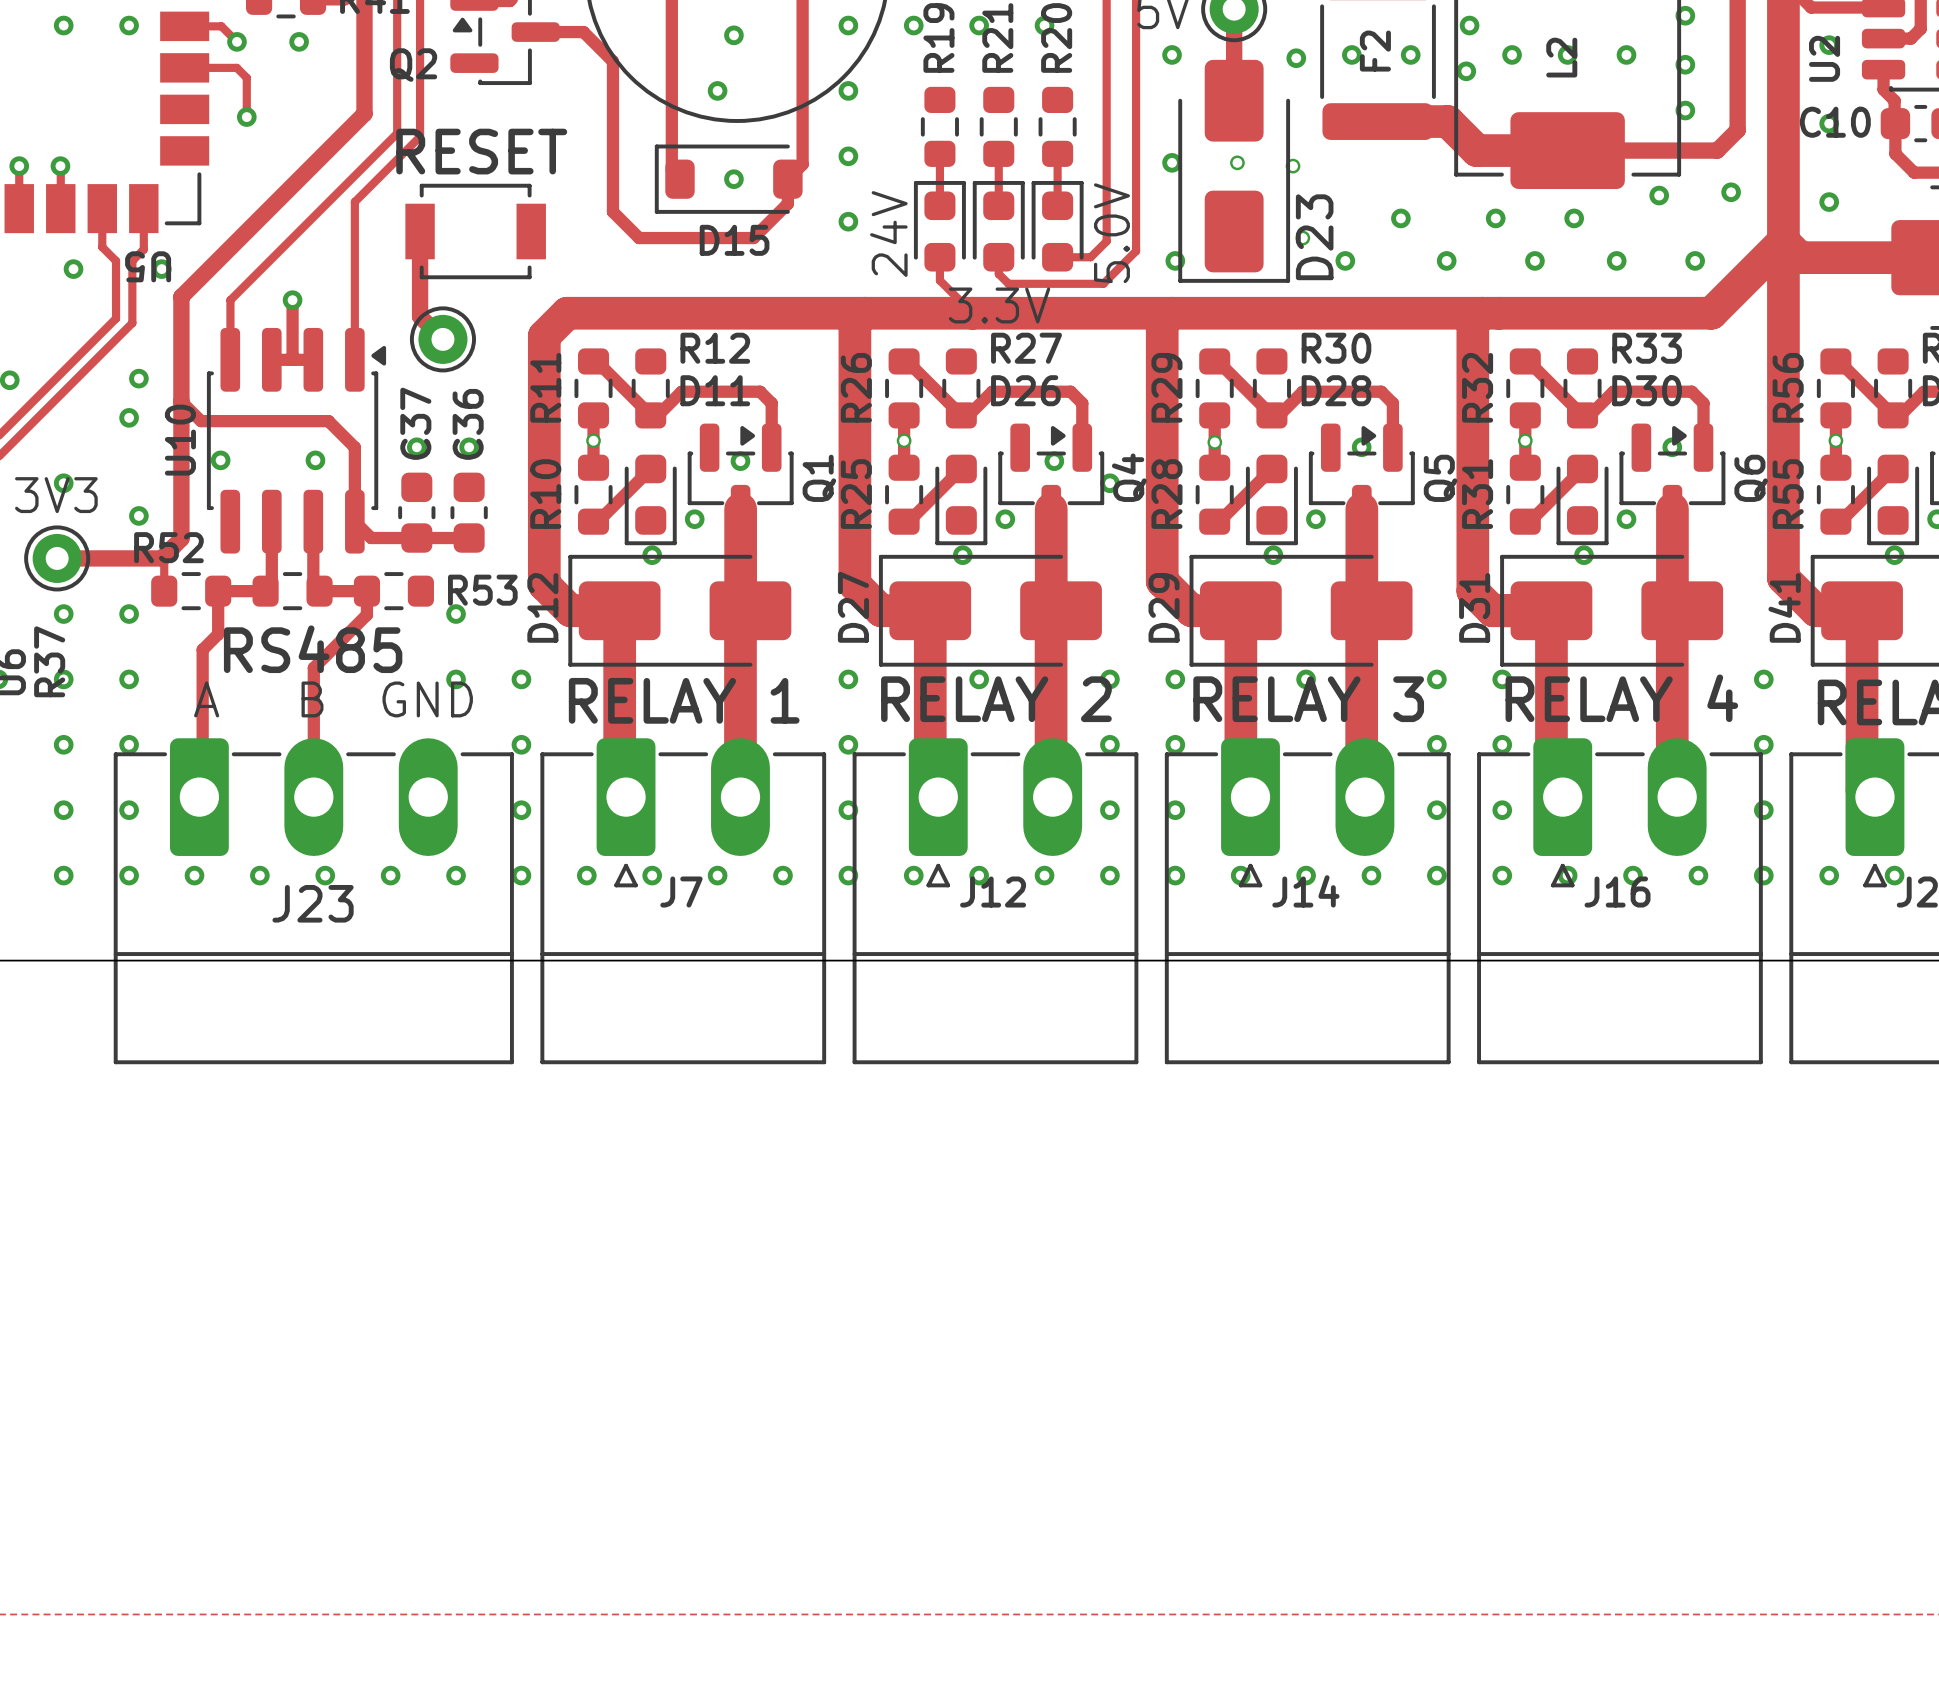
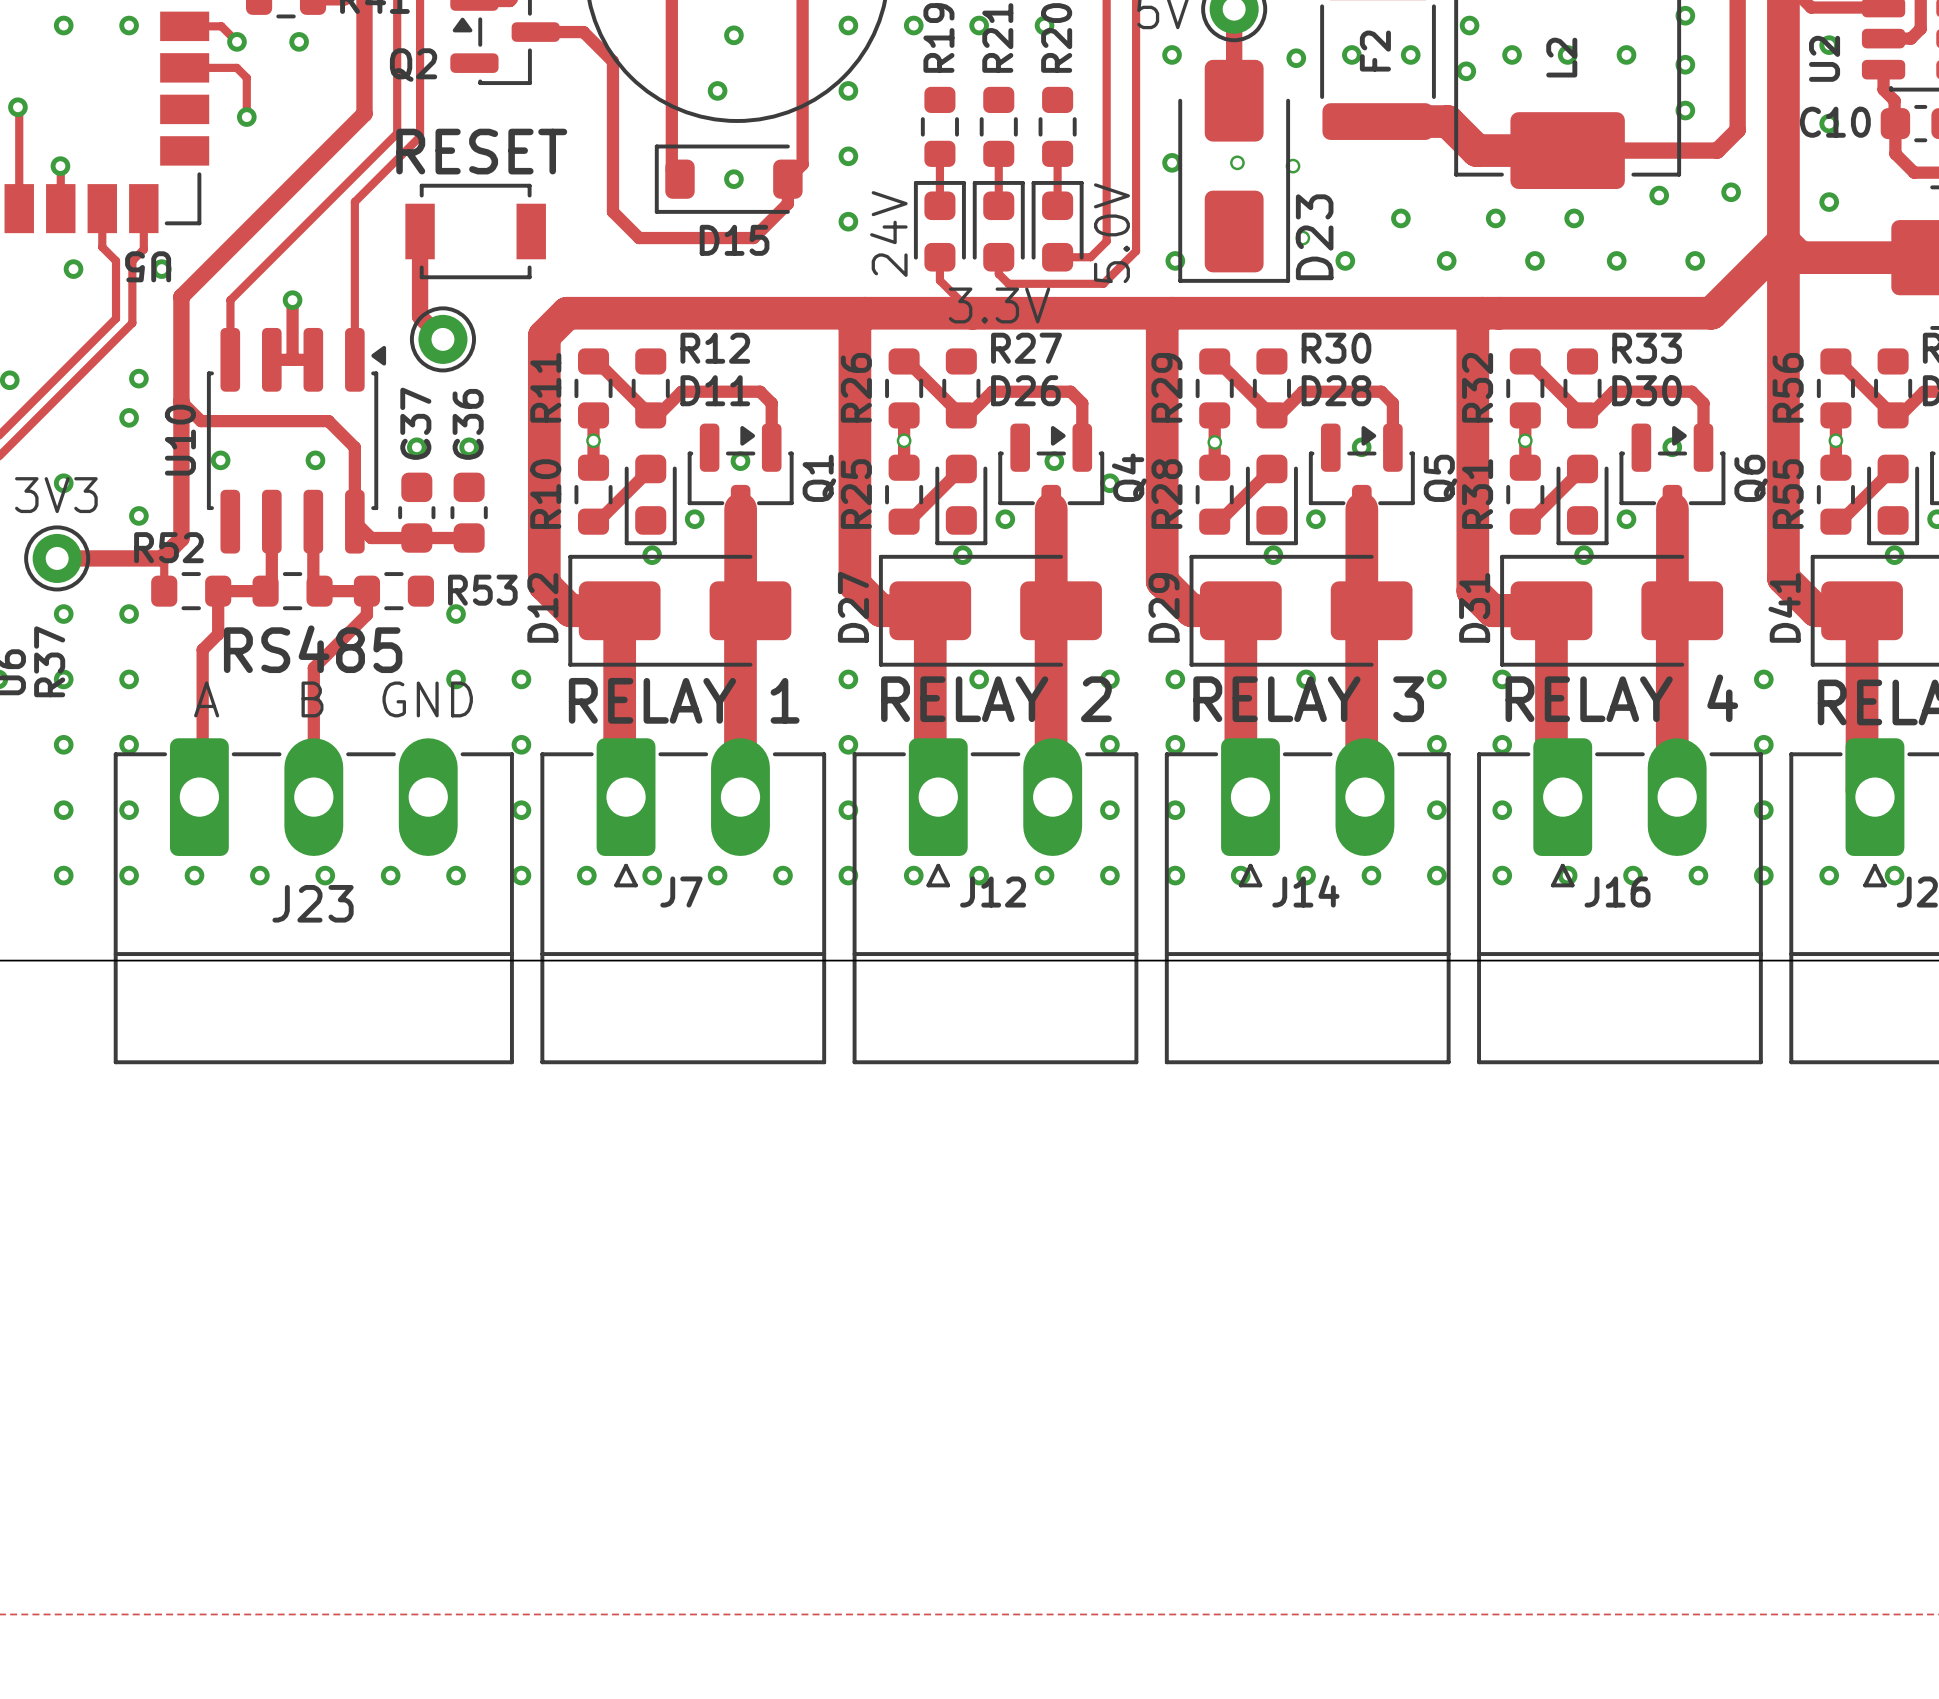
track: none -> (17, 107) (19, 166)
via: none -> (17, 107)
via: (19, 166) -> none

